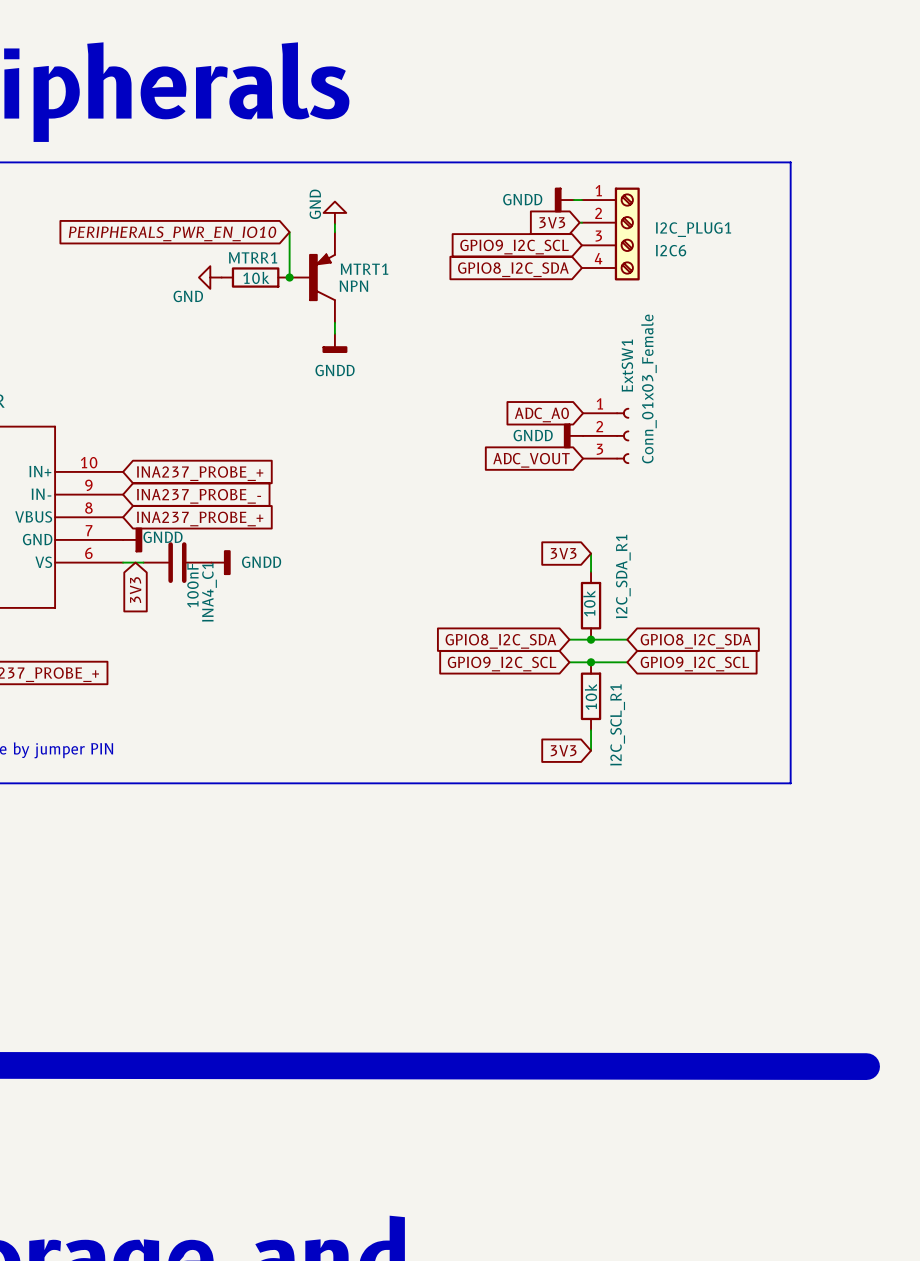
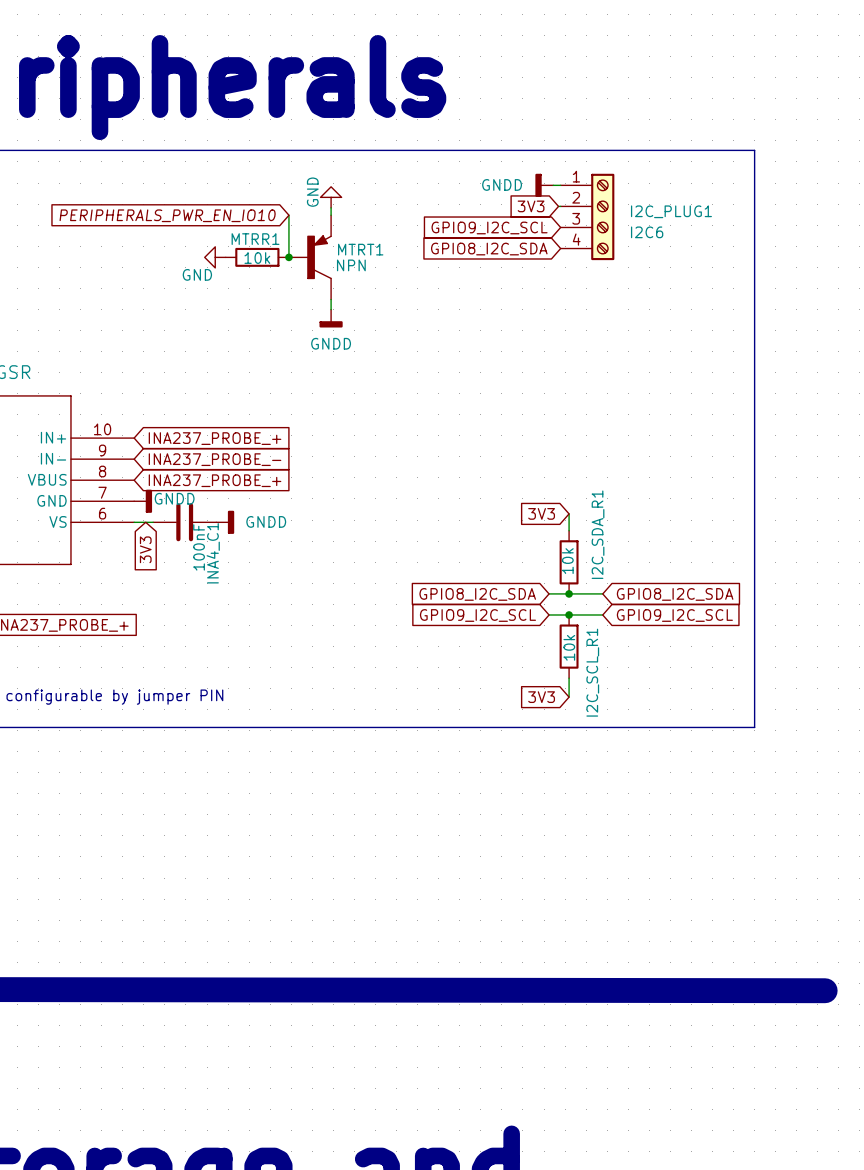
global label: ADC_A0 (541, 414) -> none
power symbol: GNDD (573, 435) -> none
ExtSW1: Conn_01x03_Female (606, 435) -> none
global label: ADC_VOUT (531, 460) -> none

